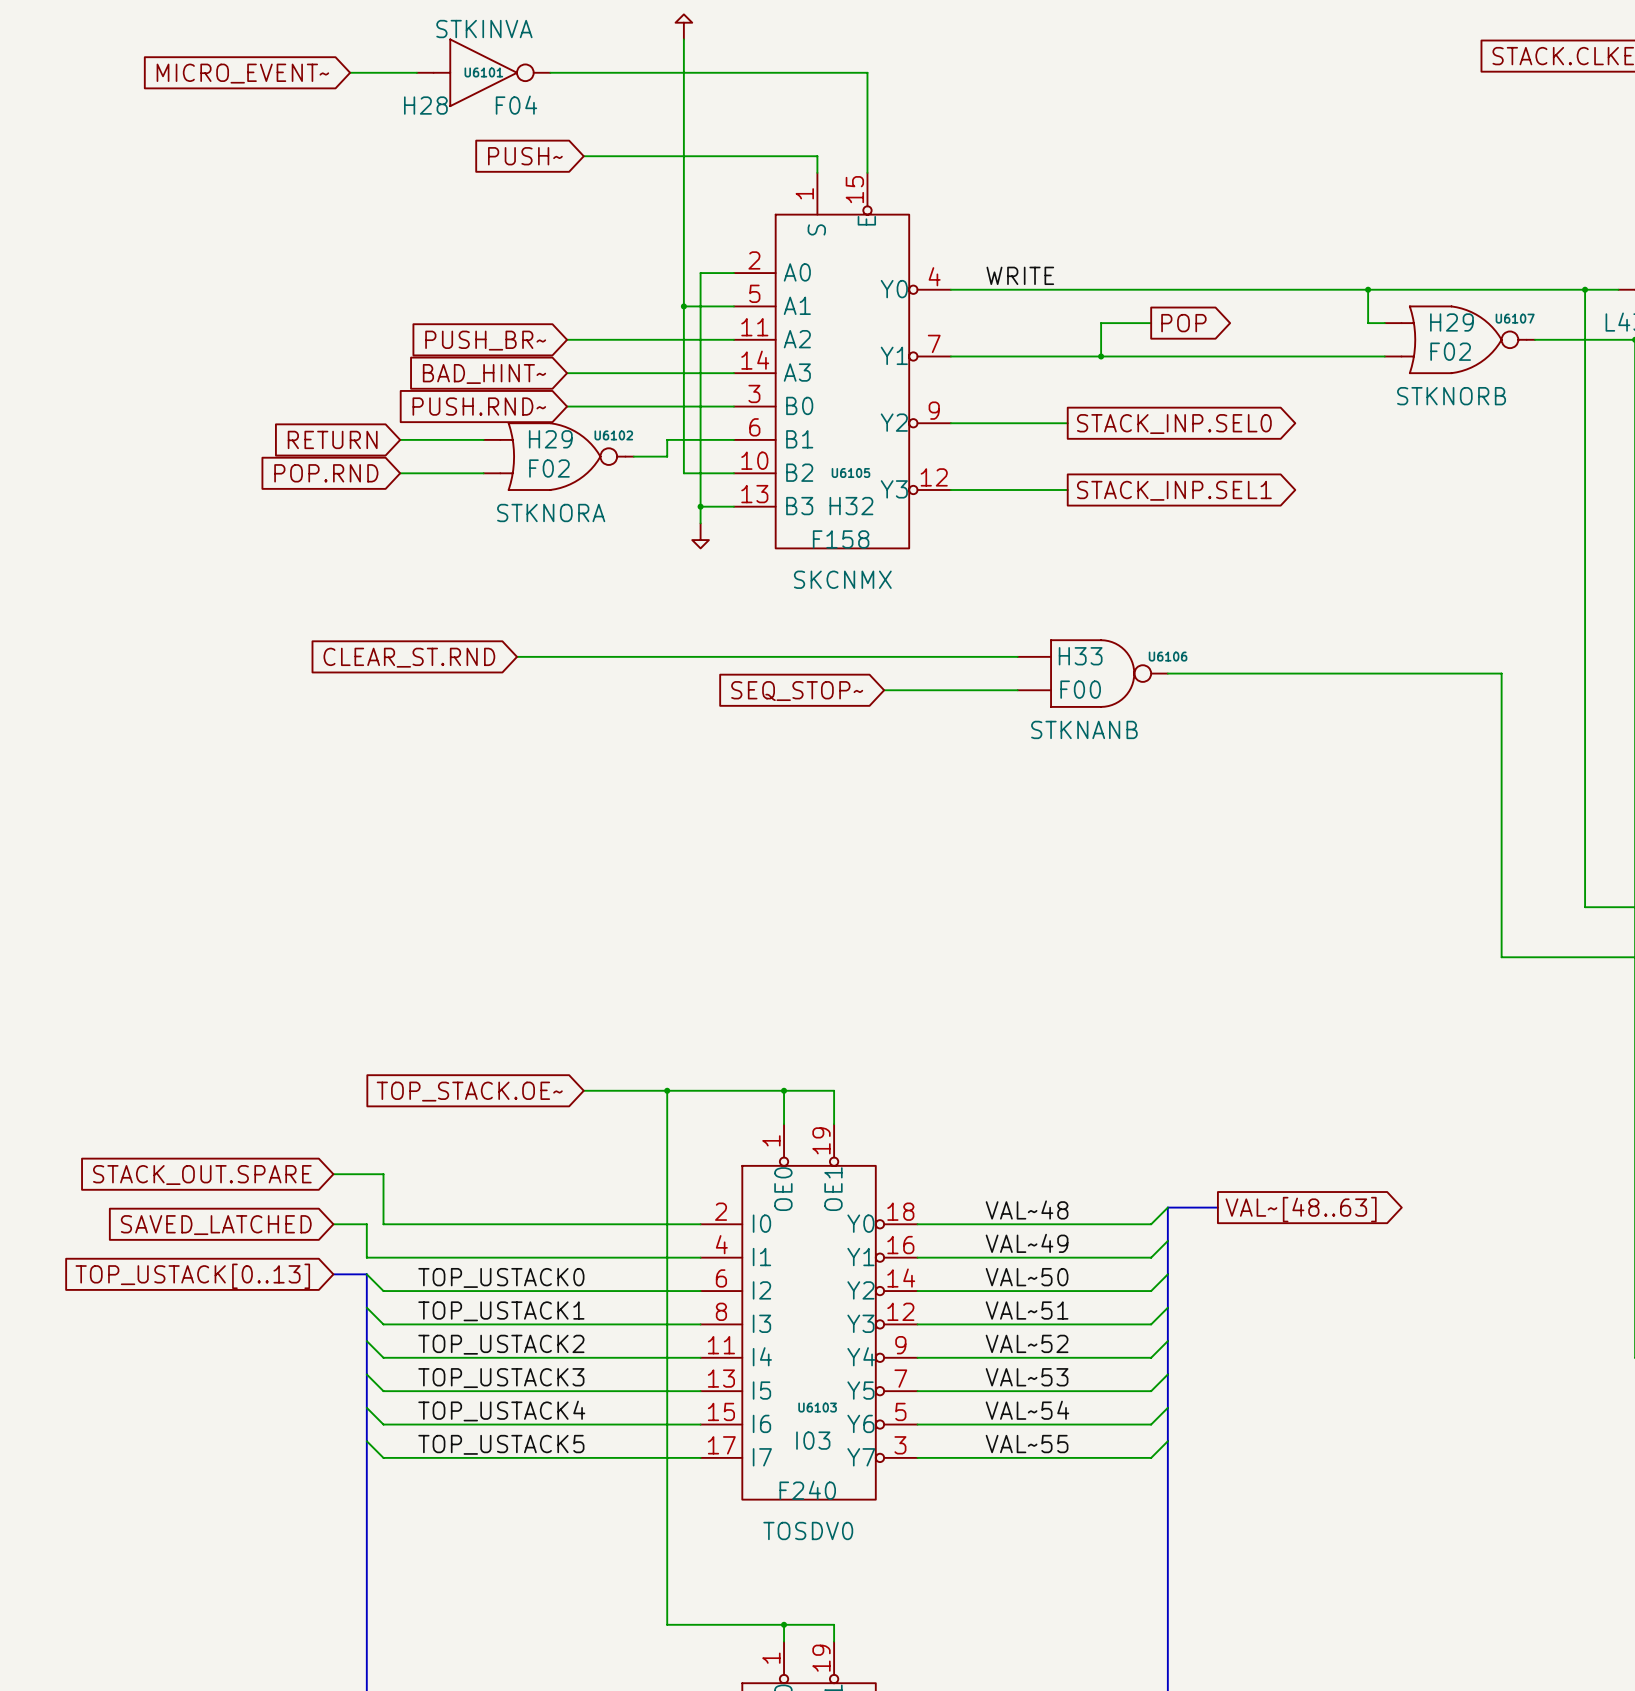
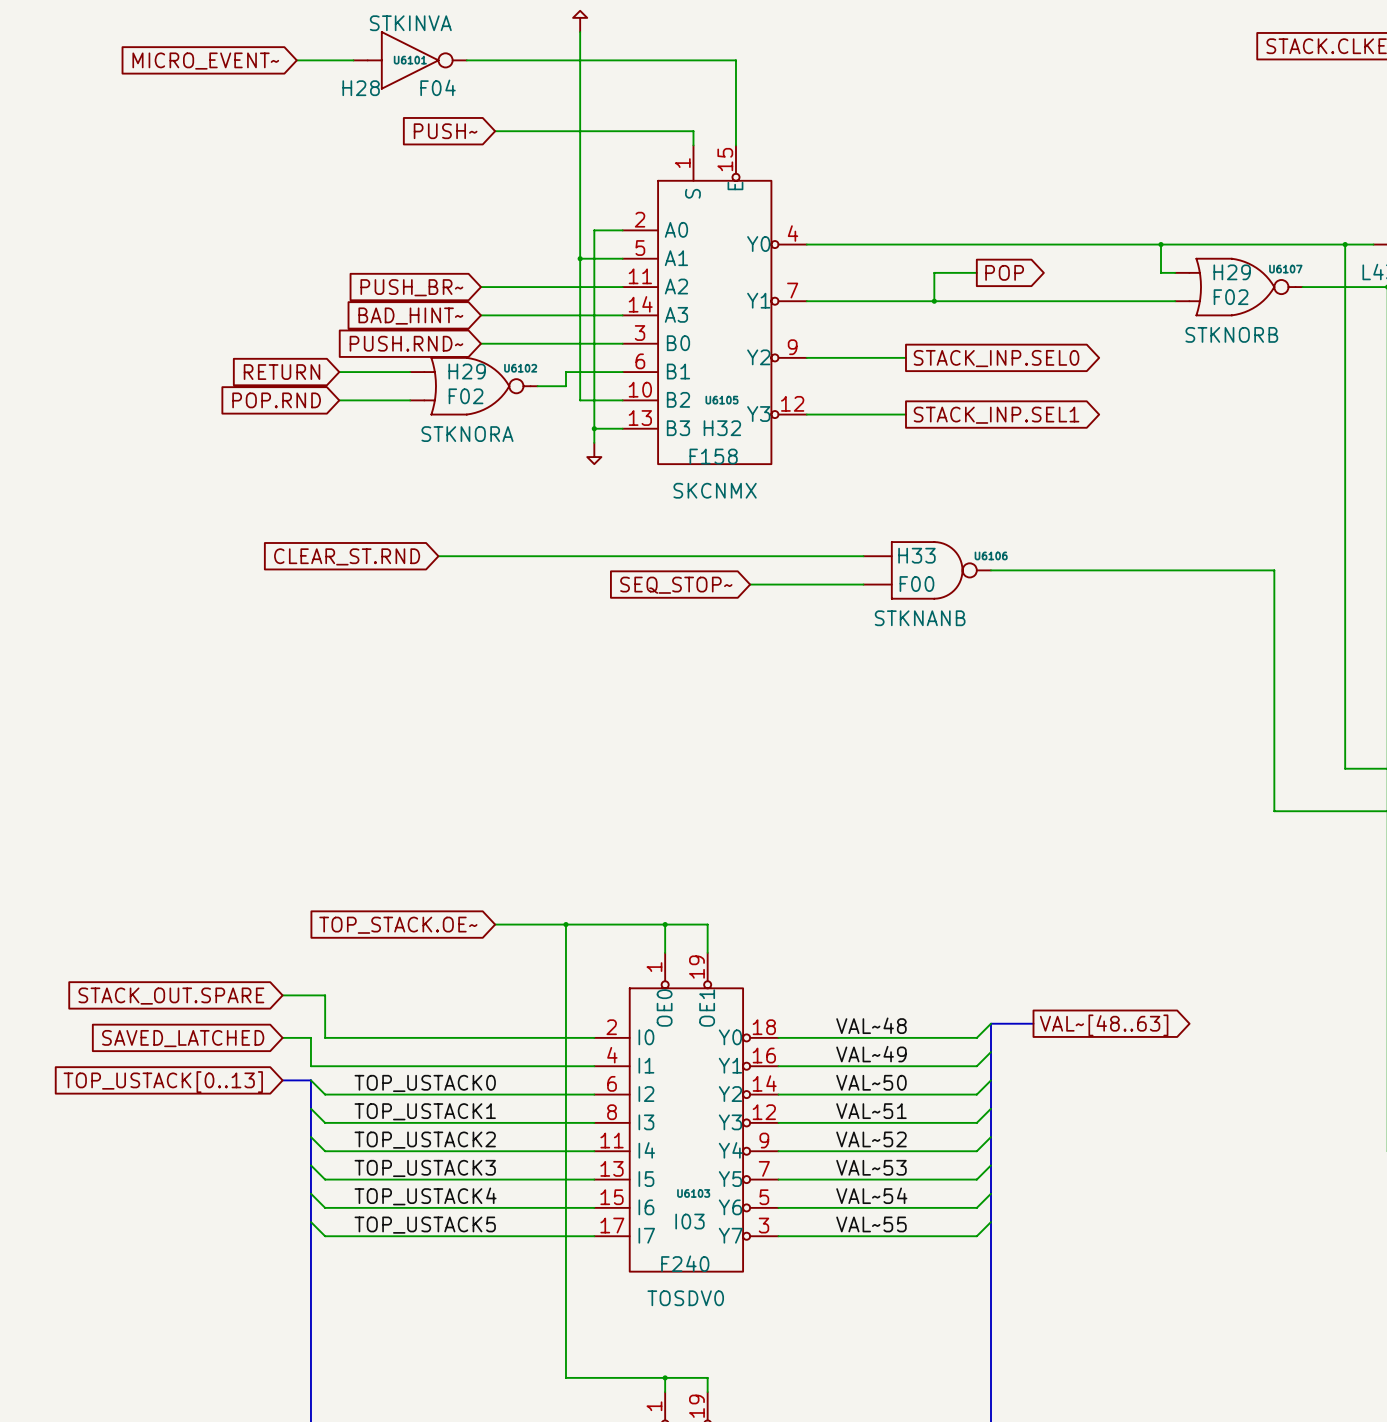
label: WRITE (1020, 275) -> none

